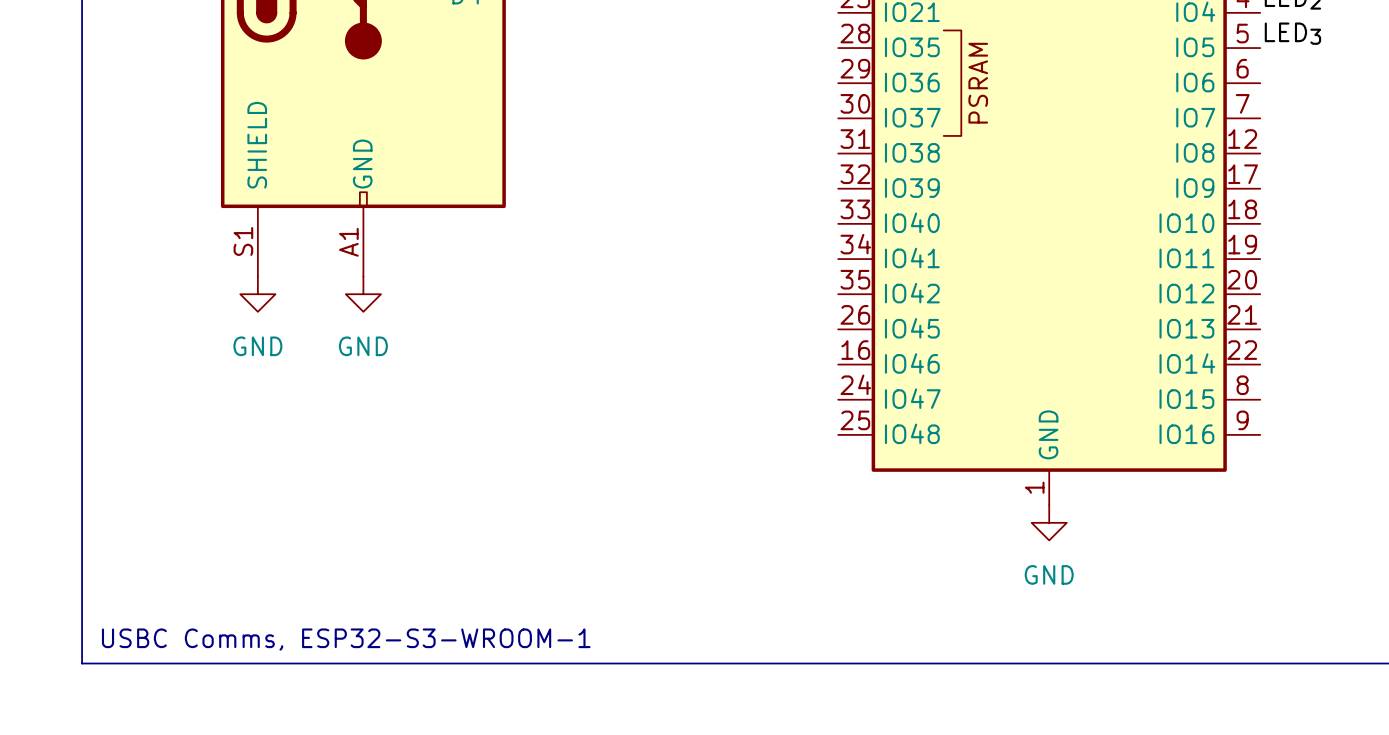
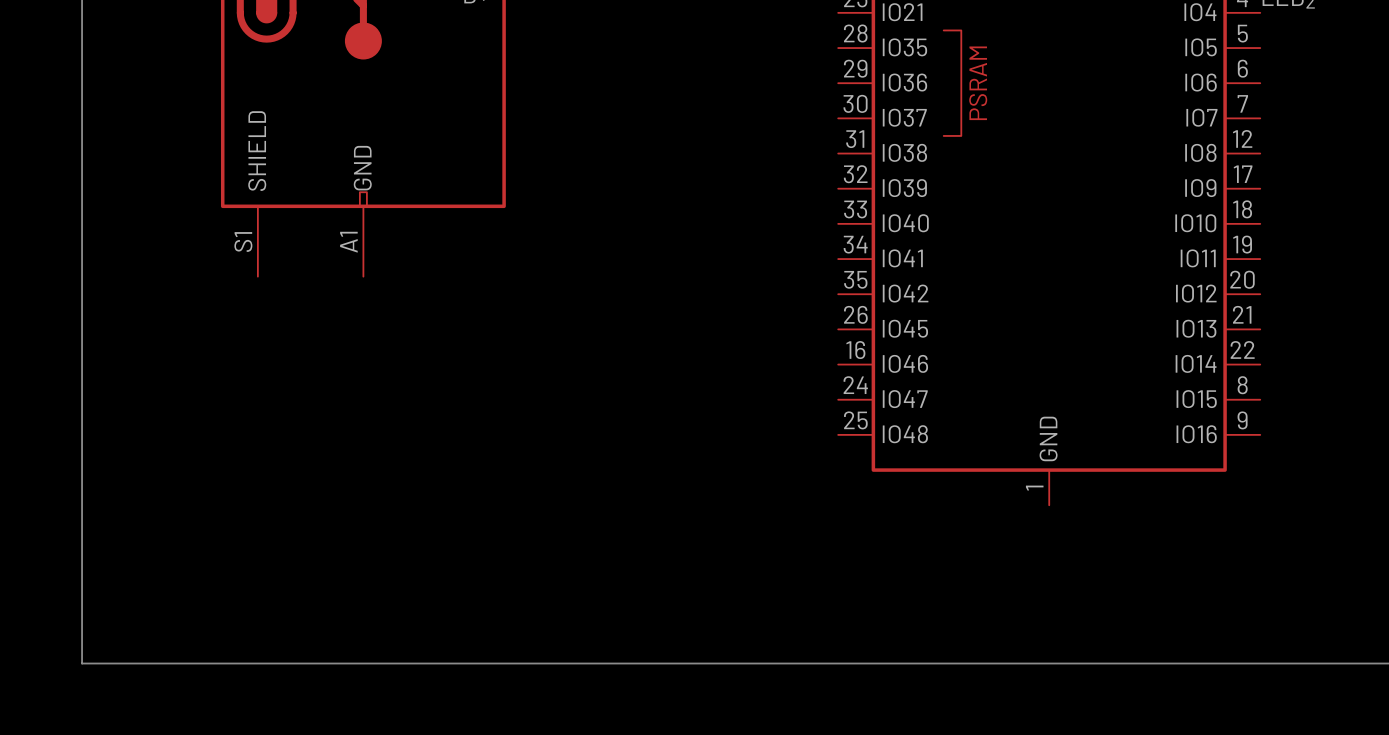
label: LED3 (1292, 33) -> none
power symbol: GND (257, 294) -> none
power symbol: GND (363, 294) -> none
power symbol: GND (1049, 522) -> none
text: USBC Comms, ESP32-S3-WROOM-1 (346, 639) -> none

